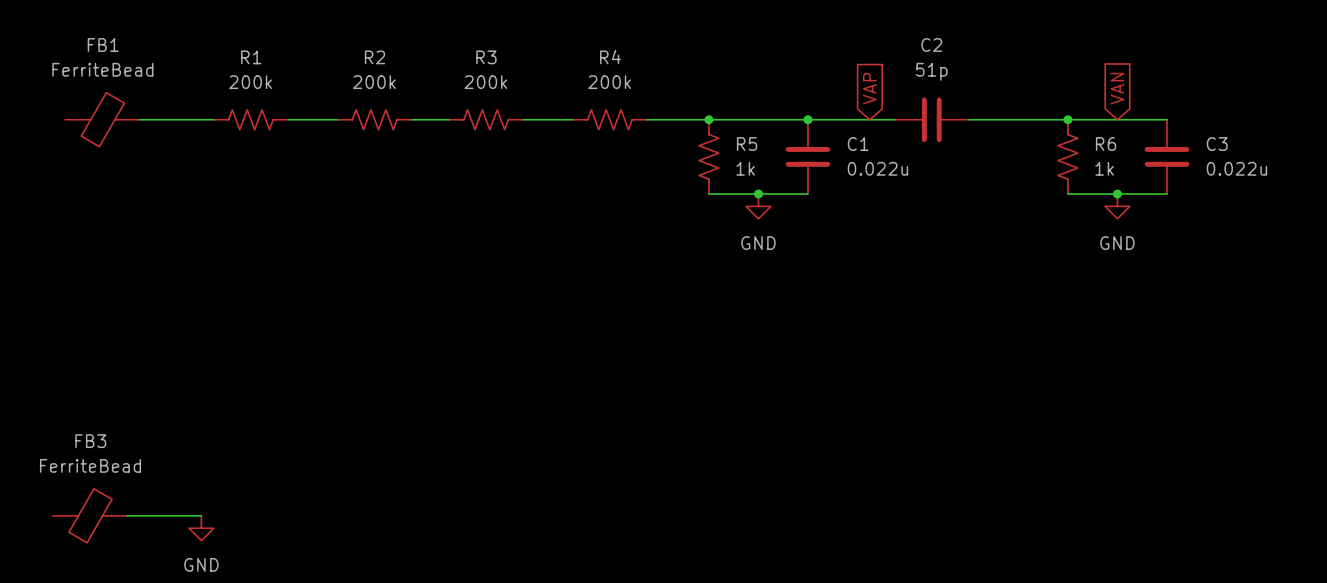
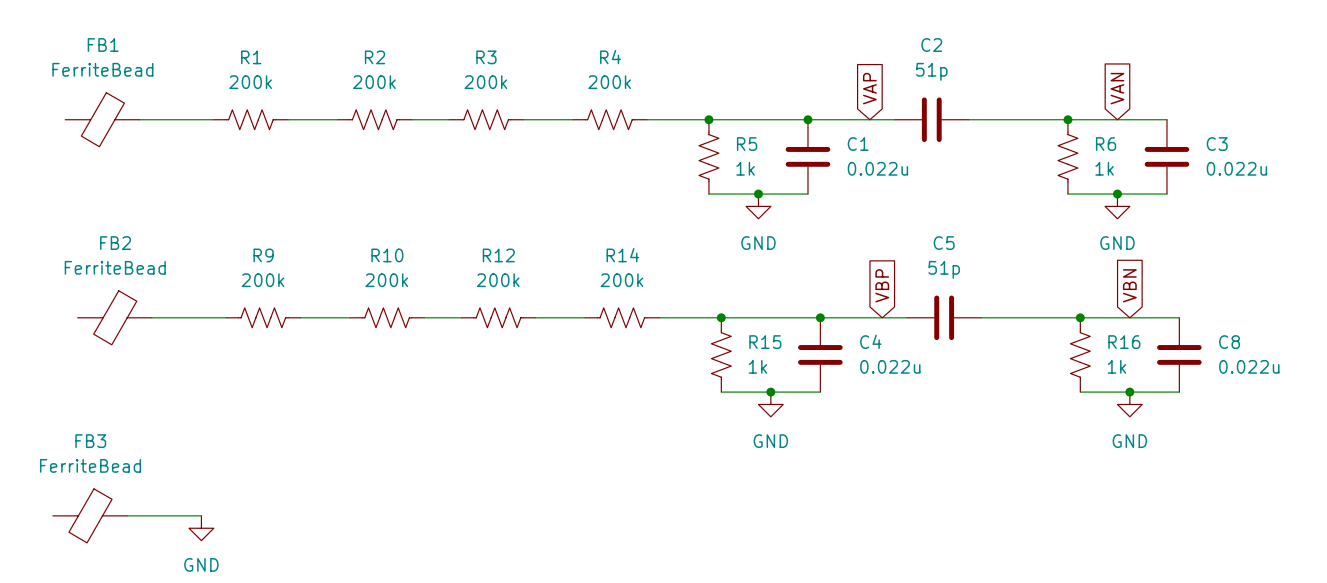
global label: none -> VBP (882, 285)
global label: none -> VBN (1129, 285)
FB2: none -> FerriteBead (114, 317)
wire: none -> (151, 317) (226, 317)
R9: none -> 200k (263, 317)
wire: none -> (300, 317) (349, 317)
R10: none -> 200k (387, 317)
wire: none -> (424, 317) (461, 317)
R12: none -> 200k (498, 317)
wire: none -> (535, 317) (585, 317)
R14: none -> 200k (622, 317)
wire: none -> (659, 317) (907, 317)
junction: none -> (721, 317)
junction: none -> (820, 317)
C5: none -> 51p (944, 317)
wire: none -> (981, 317) (1179, 317)
junction: none -> (1080, 317)
R15: none -> 1k (721, 354)
C4: none -> 0.022u (820, 354)
R16: none -> 1k (1080, 354)
C8: none -> 0.022u (1179, 354)
wire: none -> (721, 392) (820, 392)
junction: none -> (770, 392)
wire: none -> (1080, 392) (1179, 392)
junction: none -> (1129, 392)
power symbol: none -> GND (770, 404)
power symbol: none -> GND (1129, 404)

